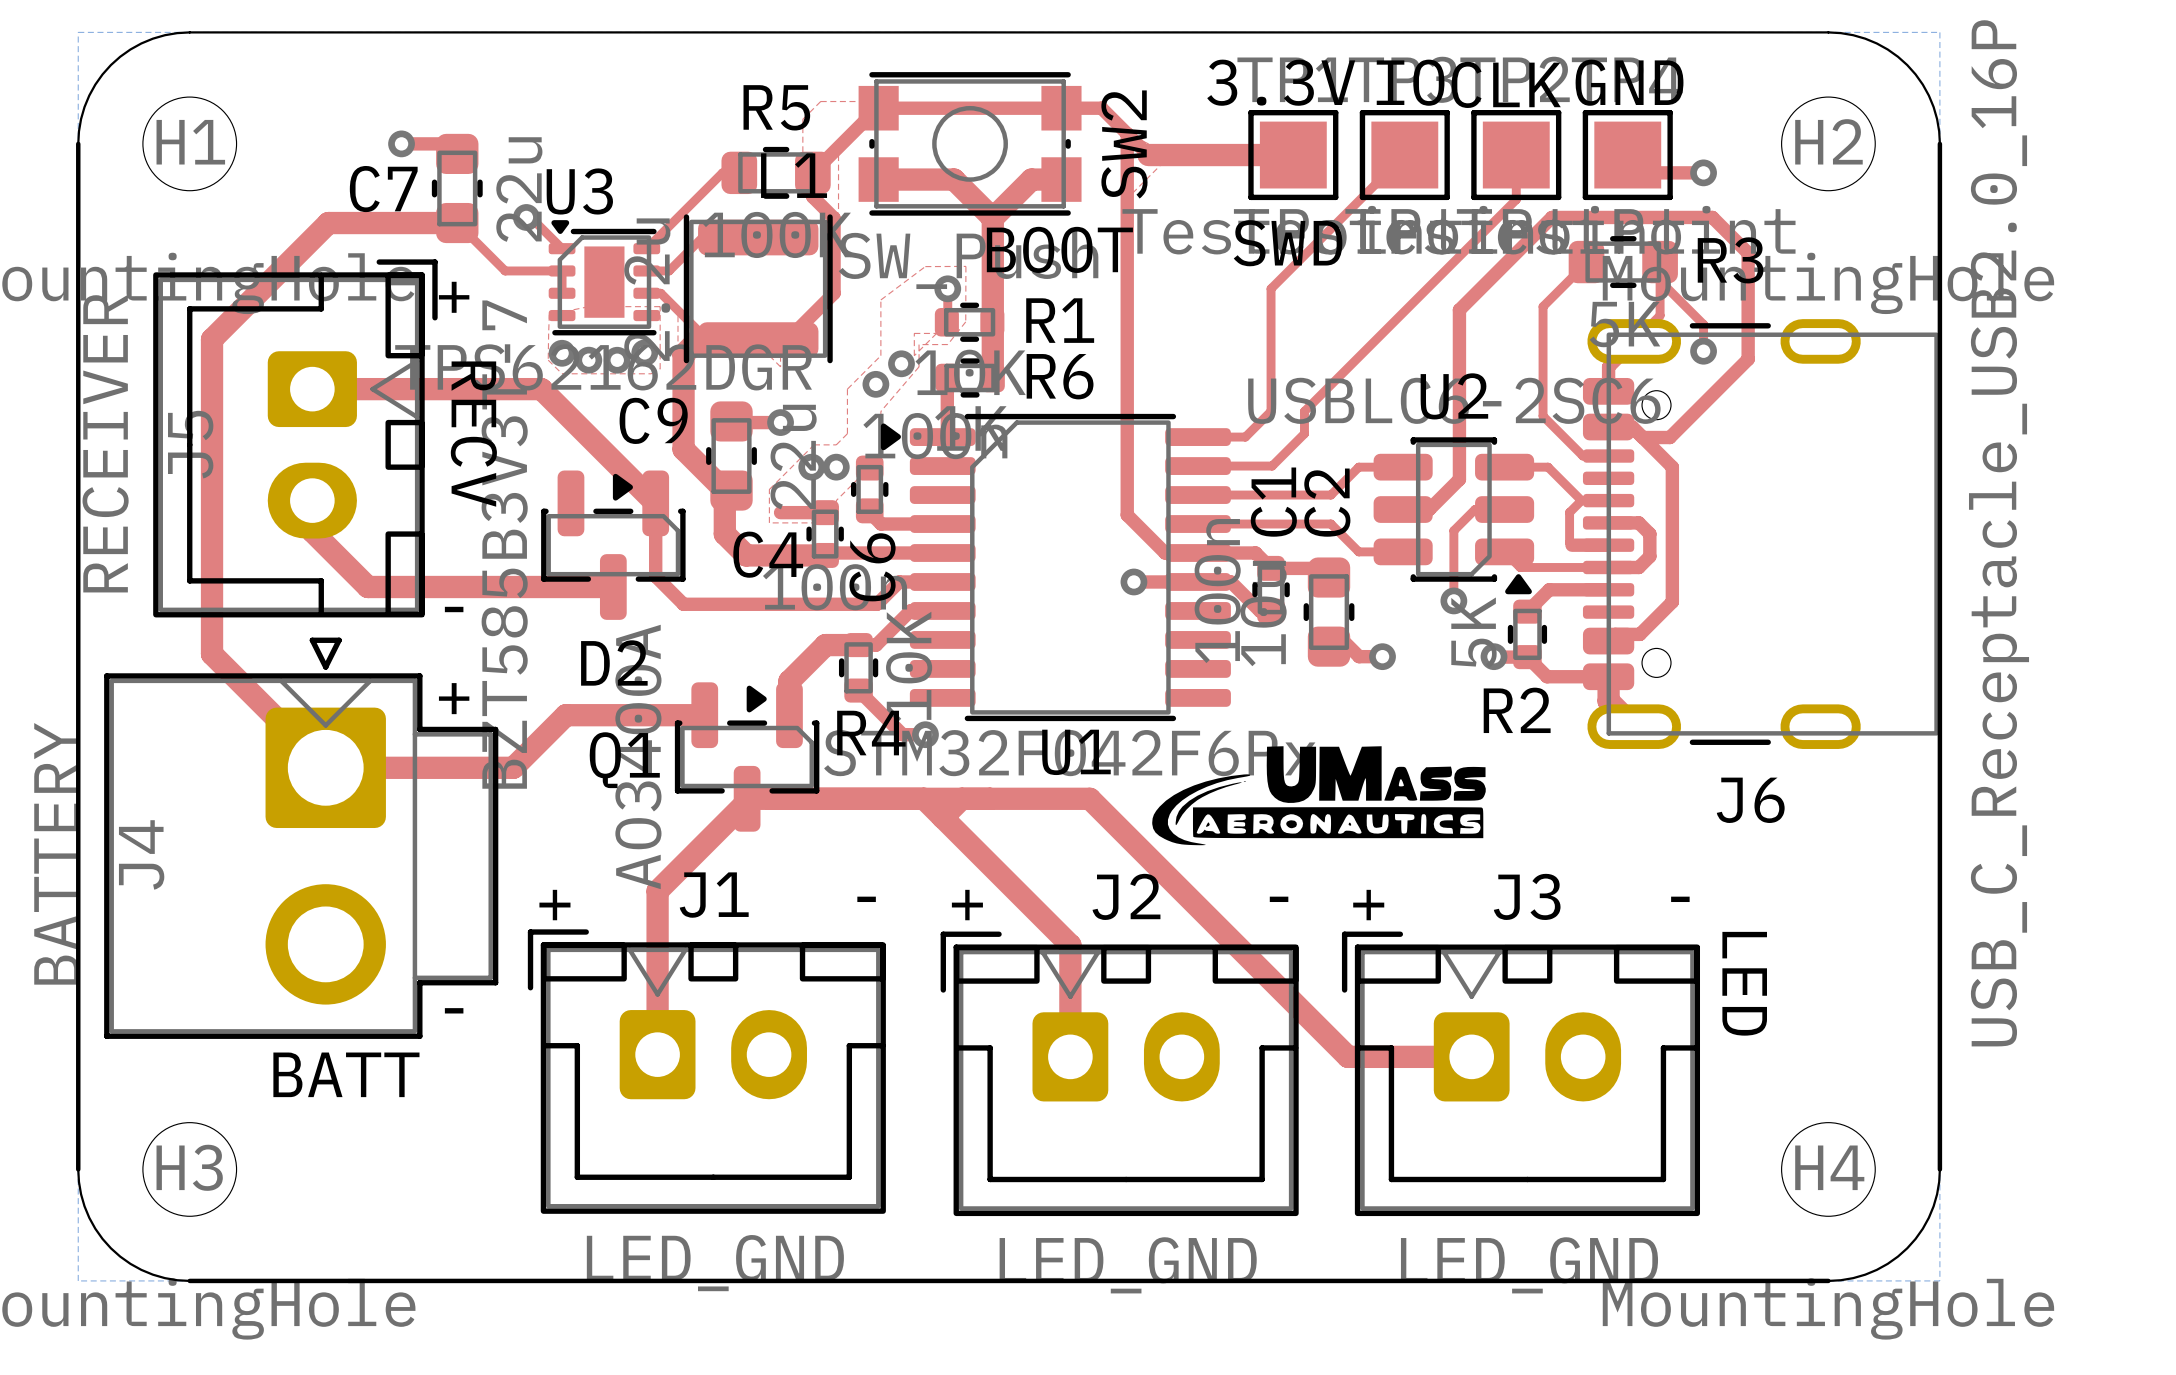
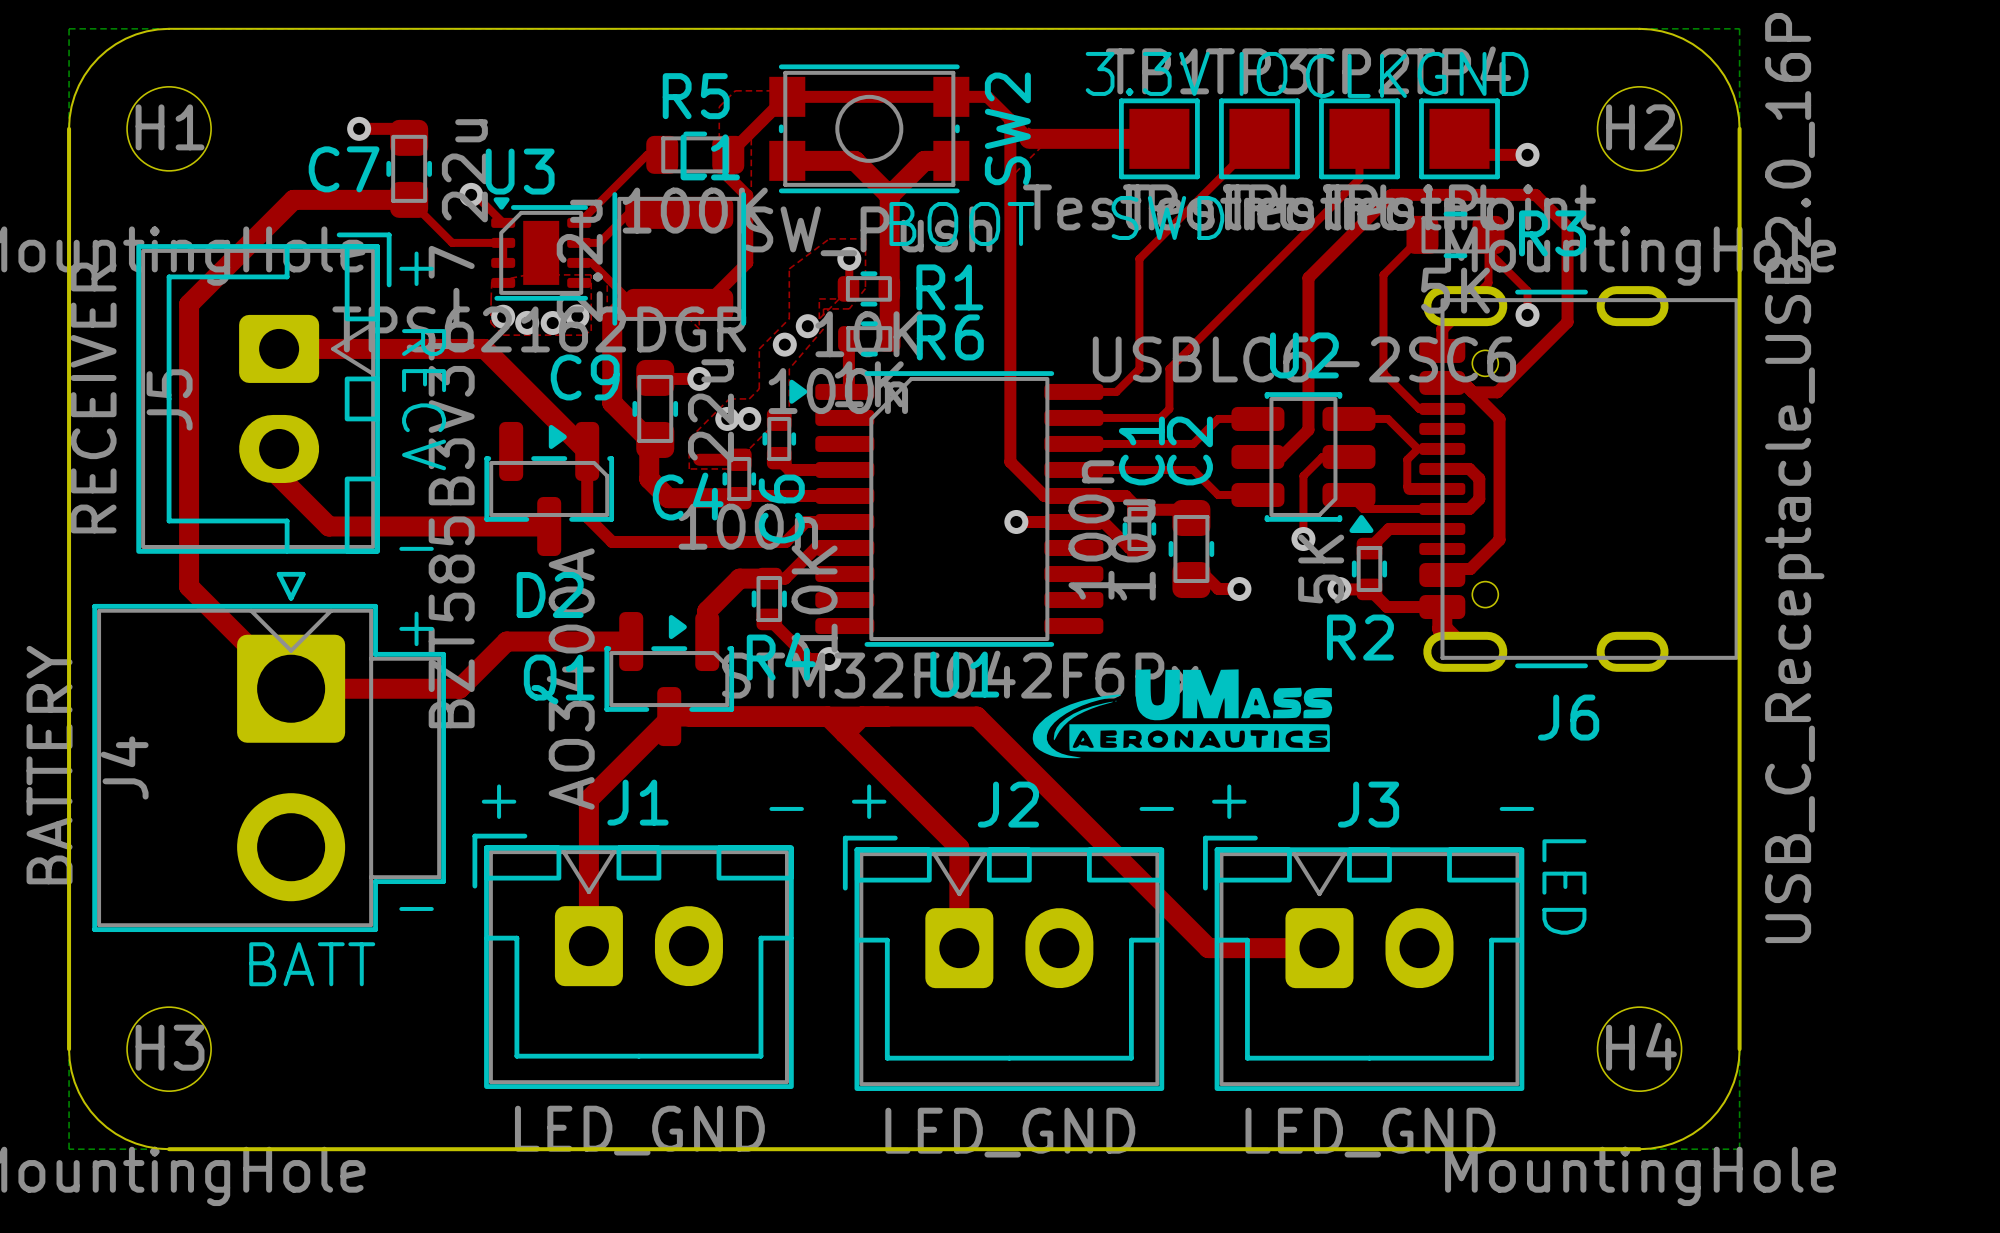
top track: (1304, 433) (1272, 466) -> (1169, 388) (1169, 408) (1160, 417) (1140, 417)

